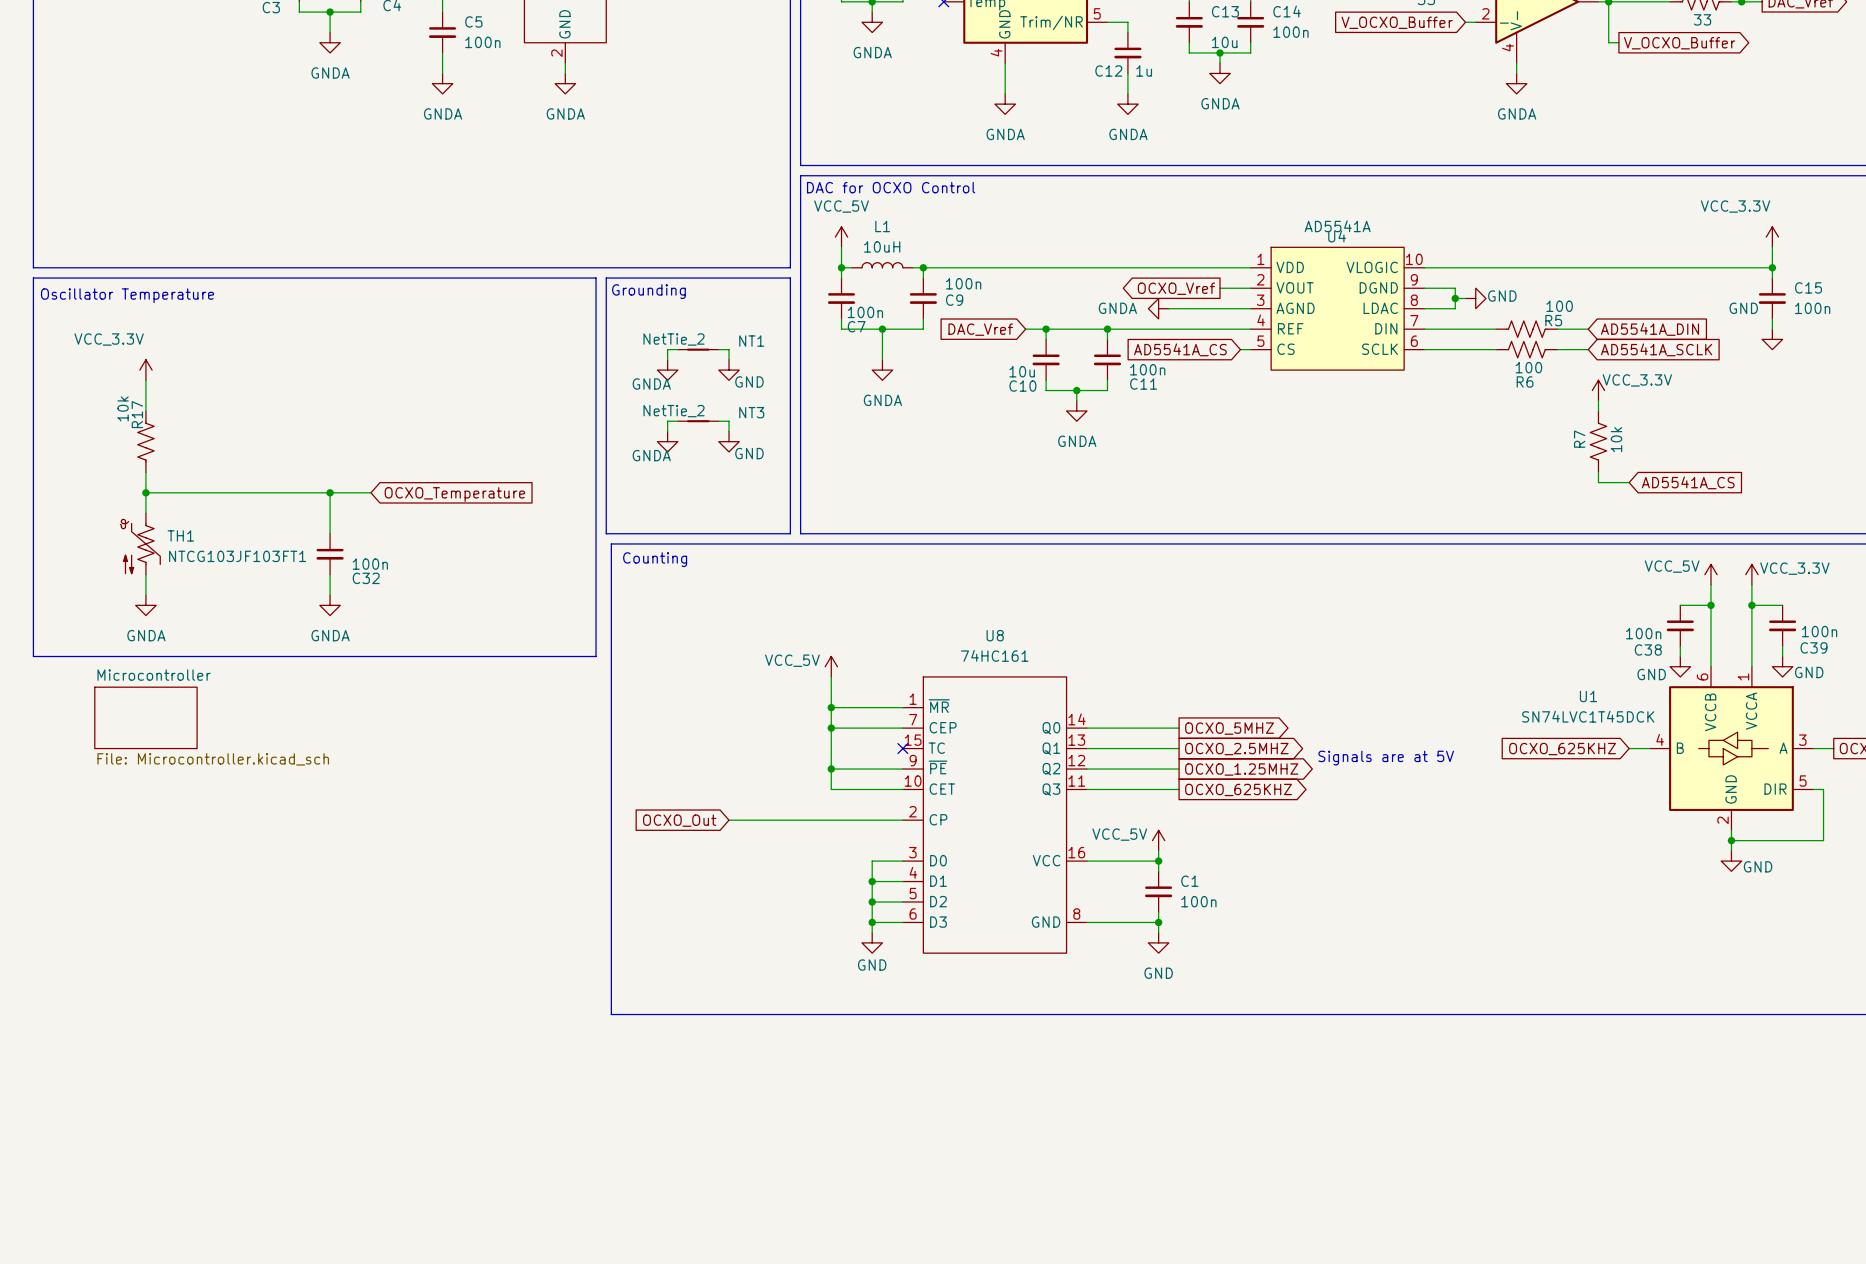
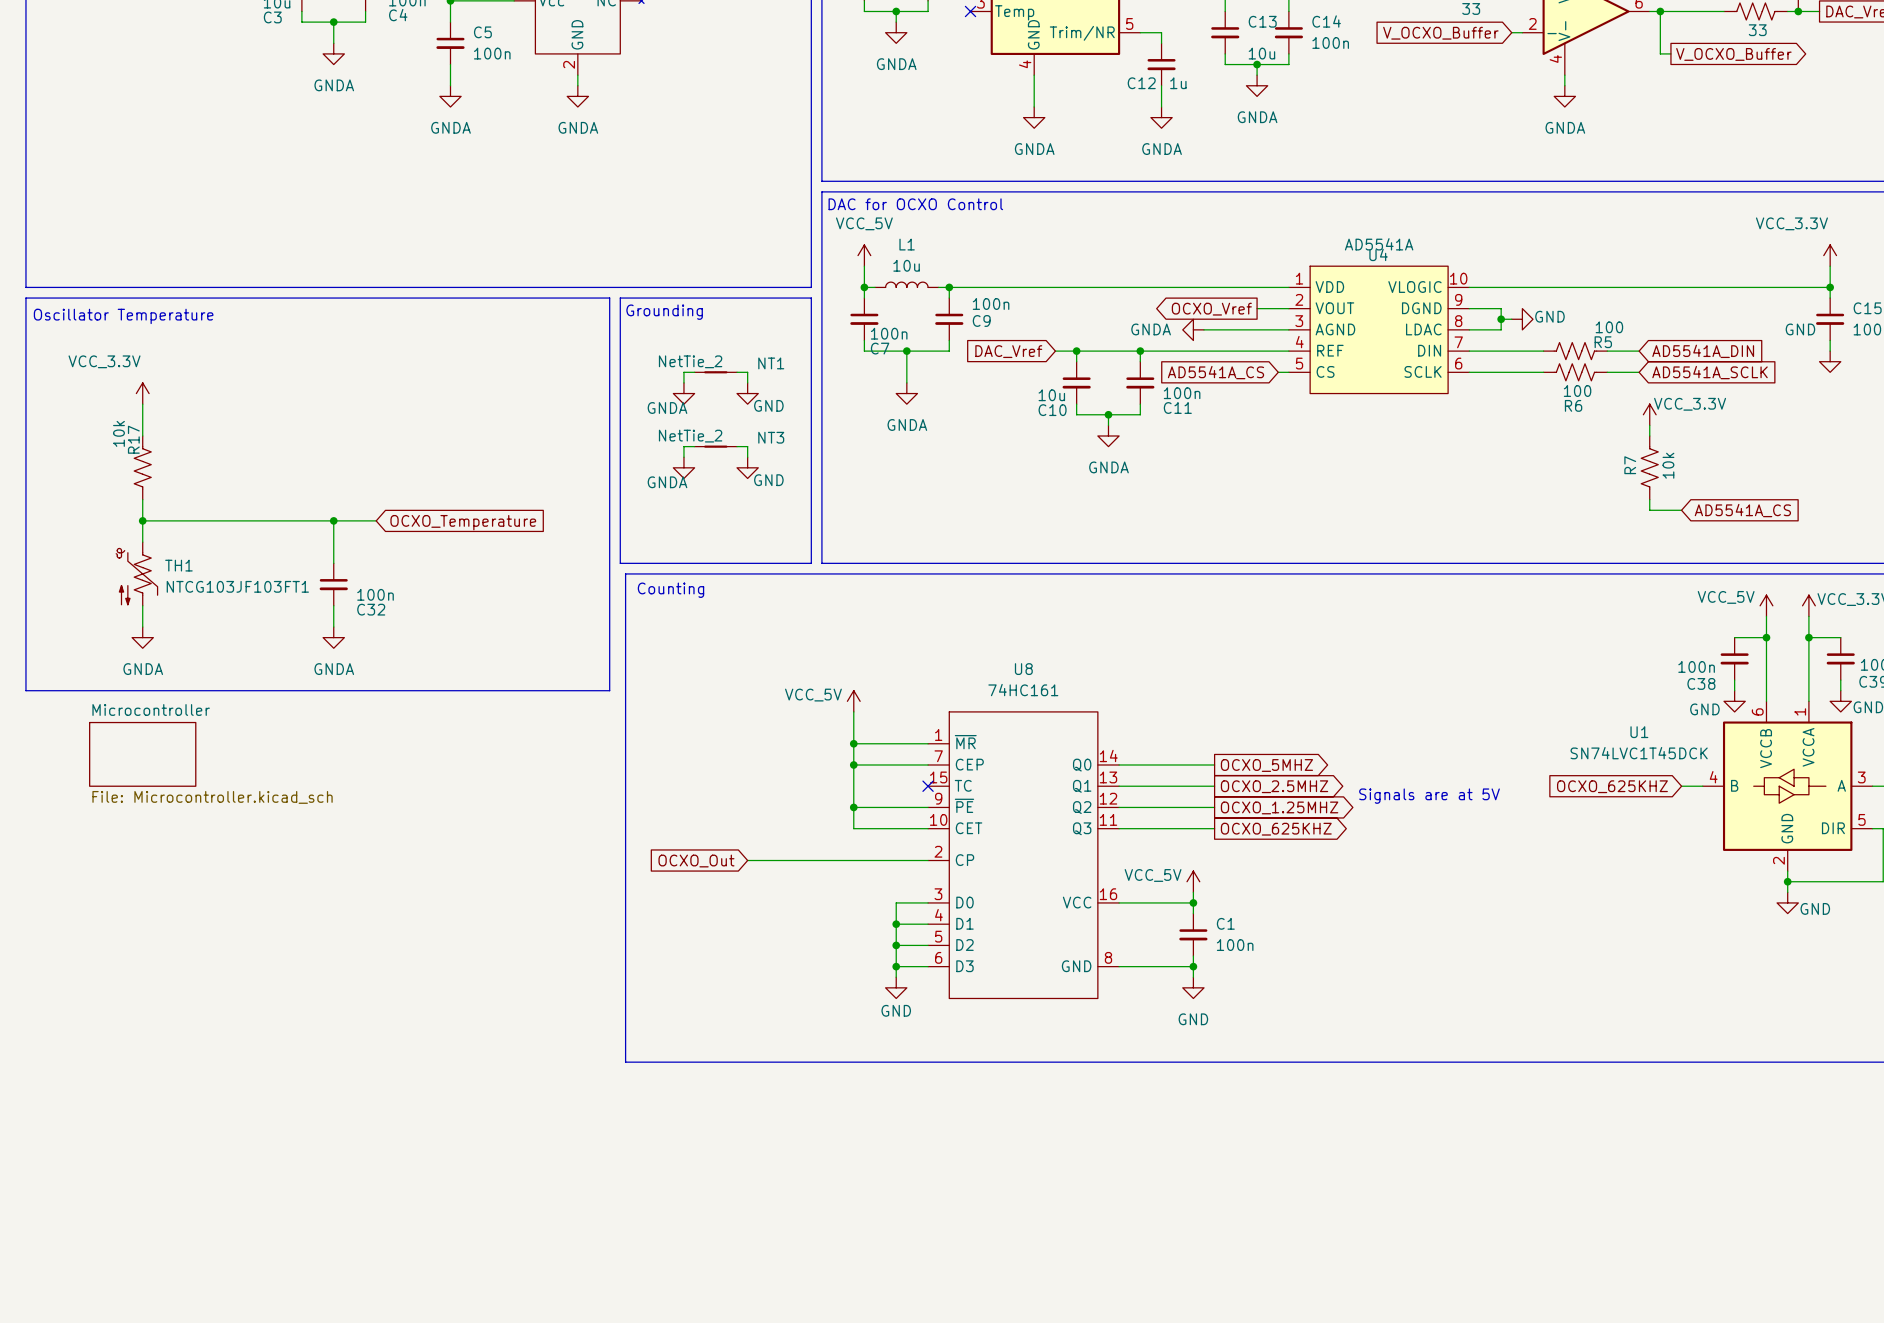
L1 value: 10uH (882, 246) -> 10u (906, 265)

